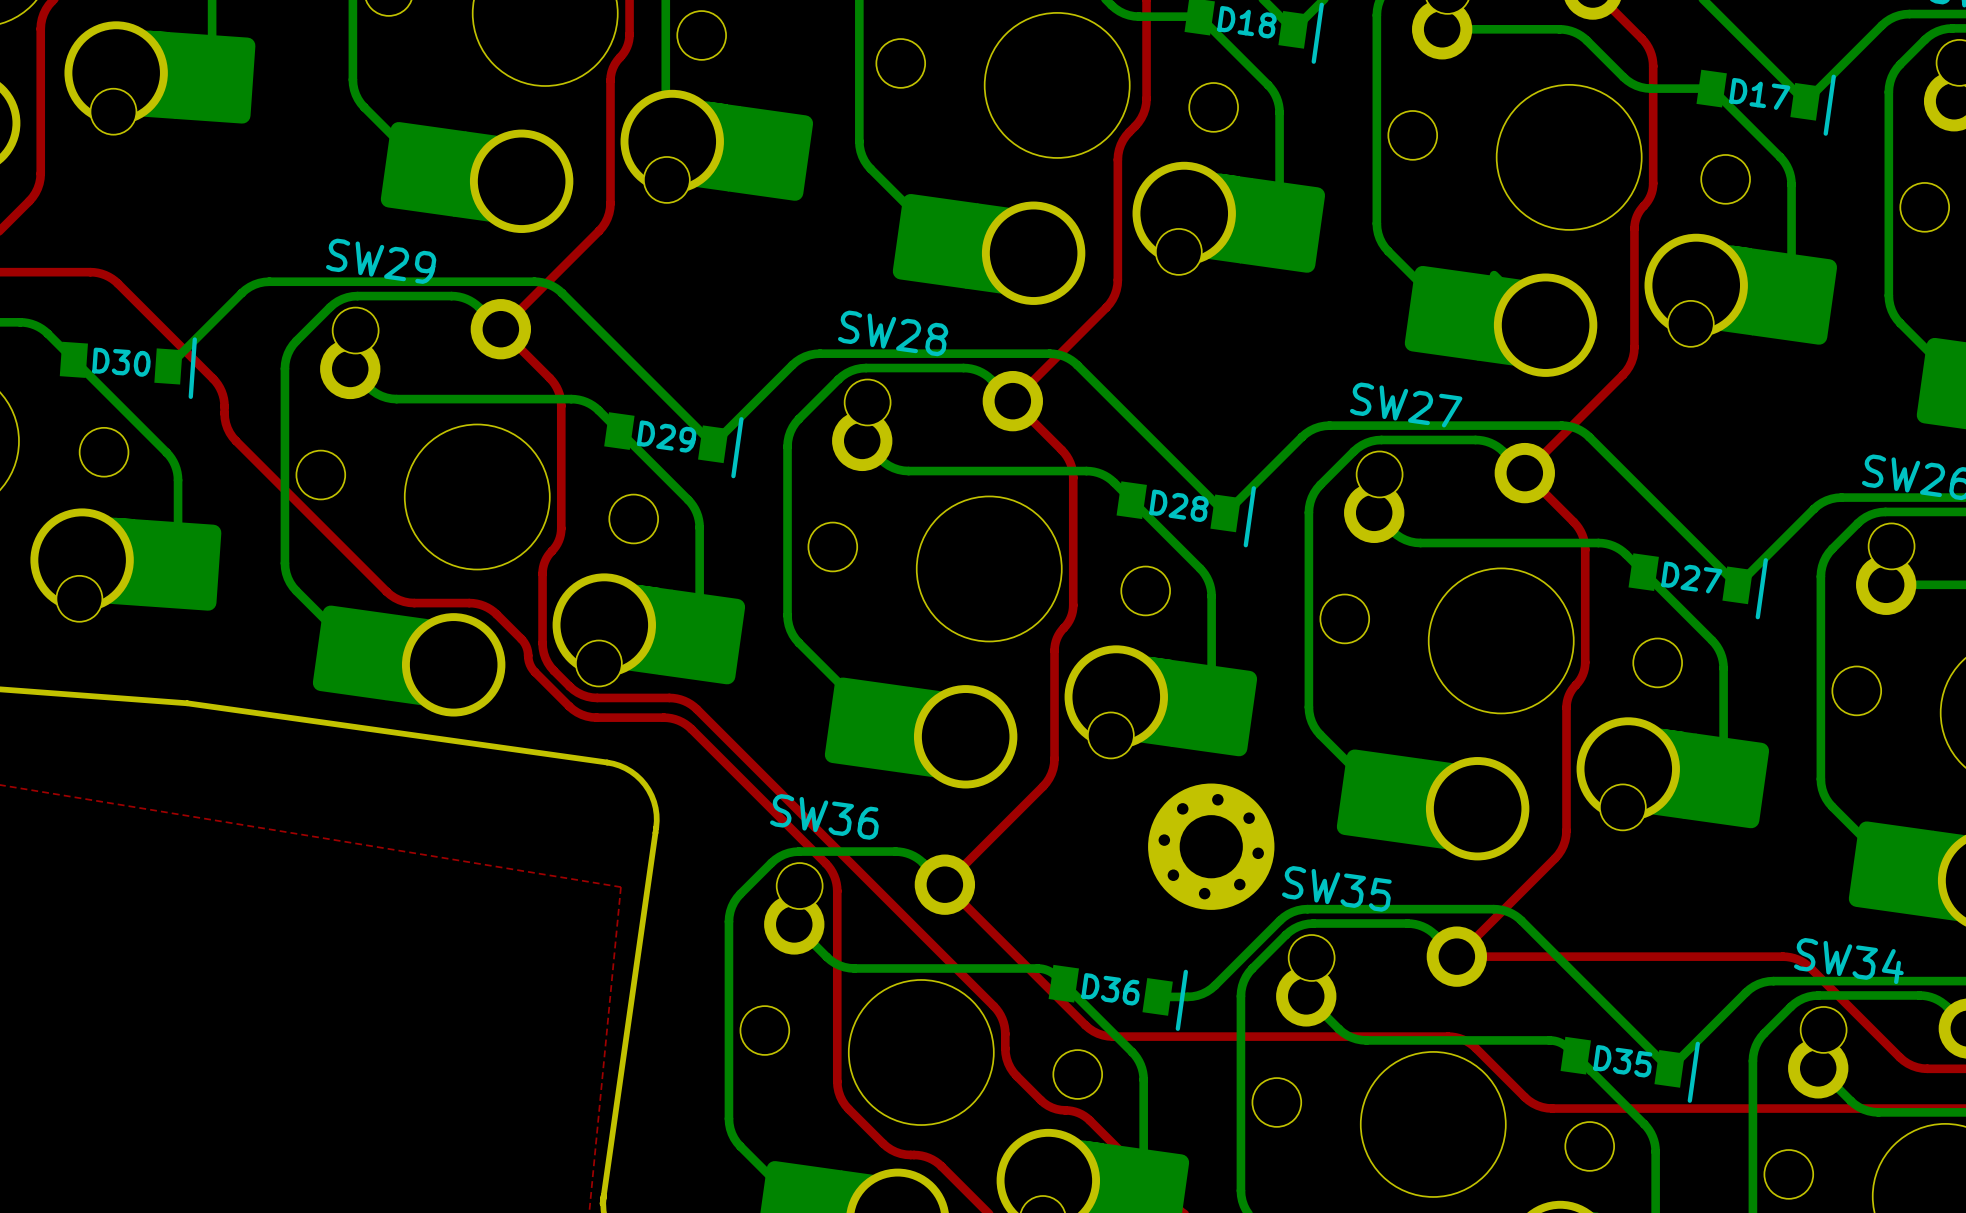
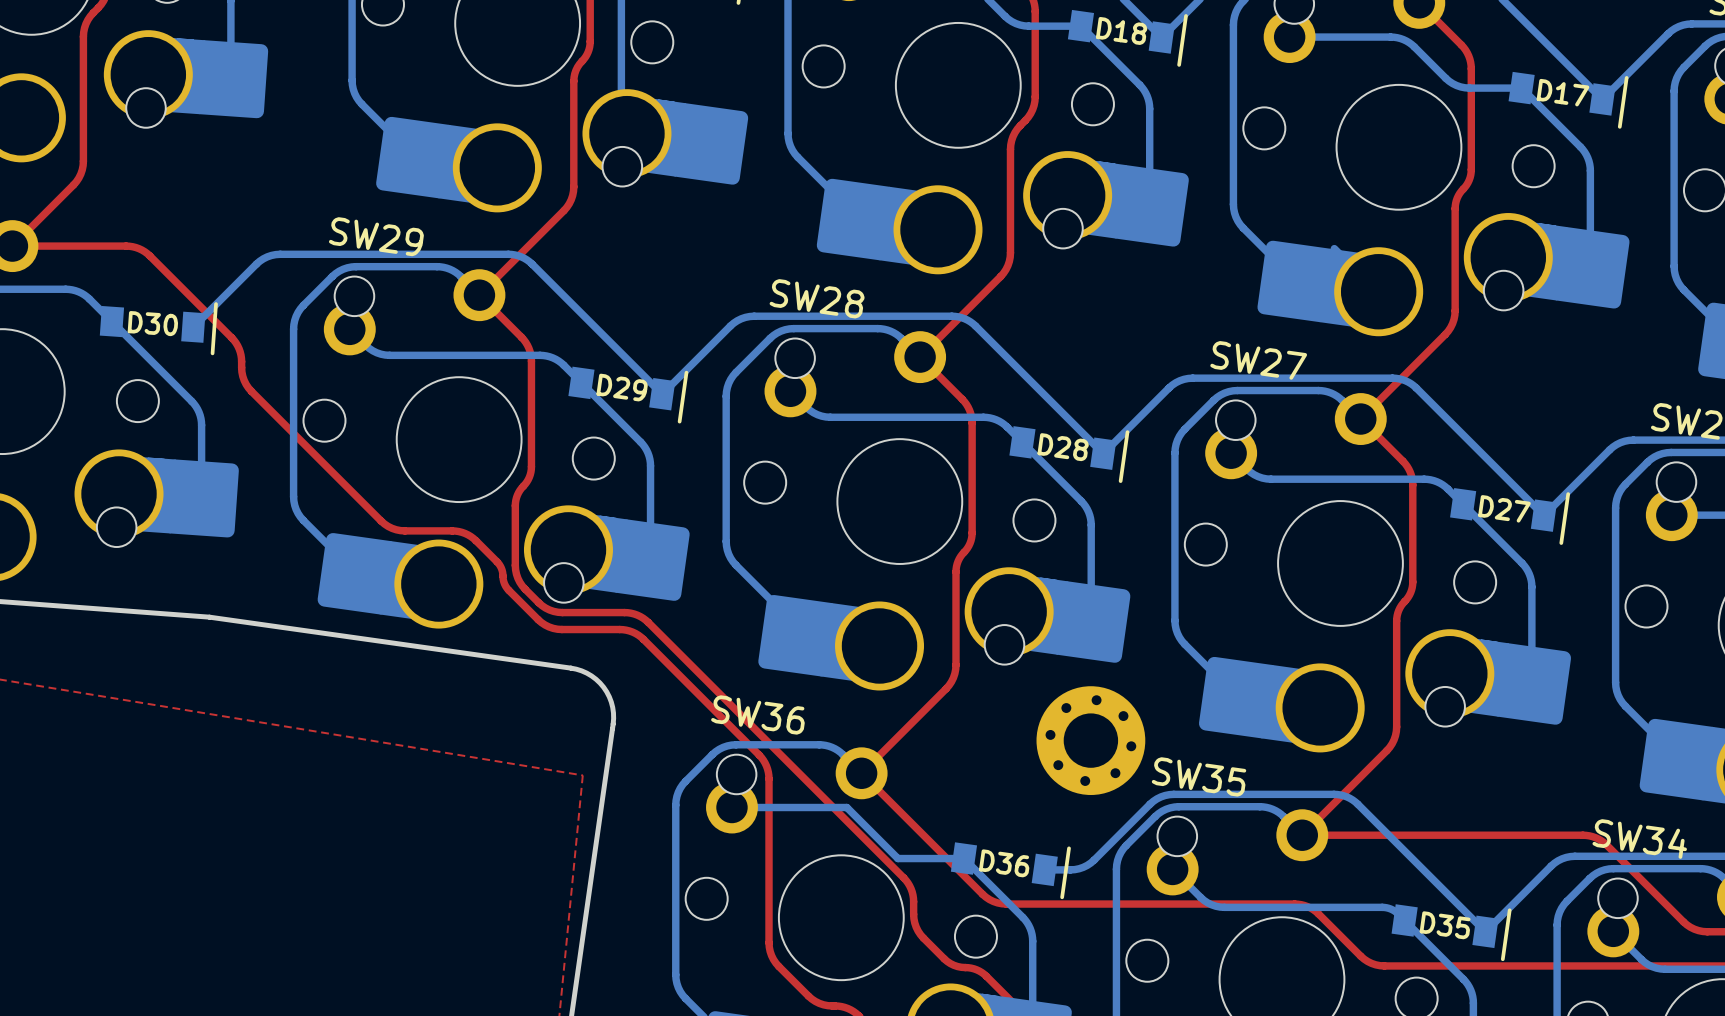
bottom track: (794, 924) (830, 960) (844, 967) (1040, 968) (1052, 972) (1063, 983) -> (731, 807) (846, 807) (897, 858) (963, 858)

